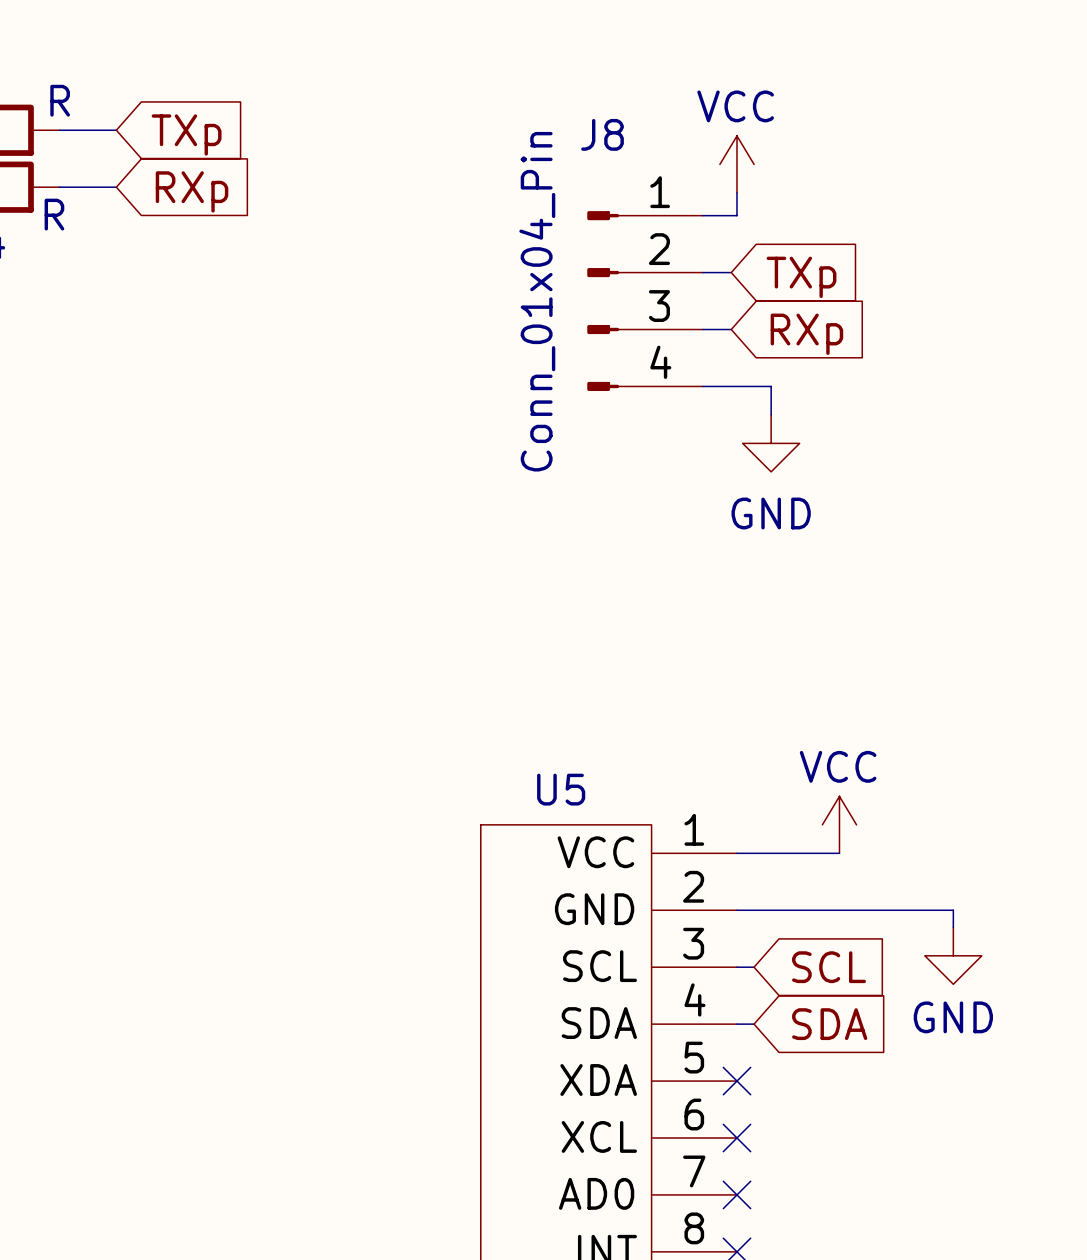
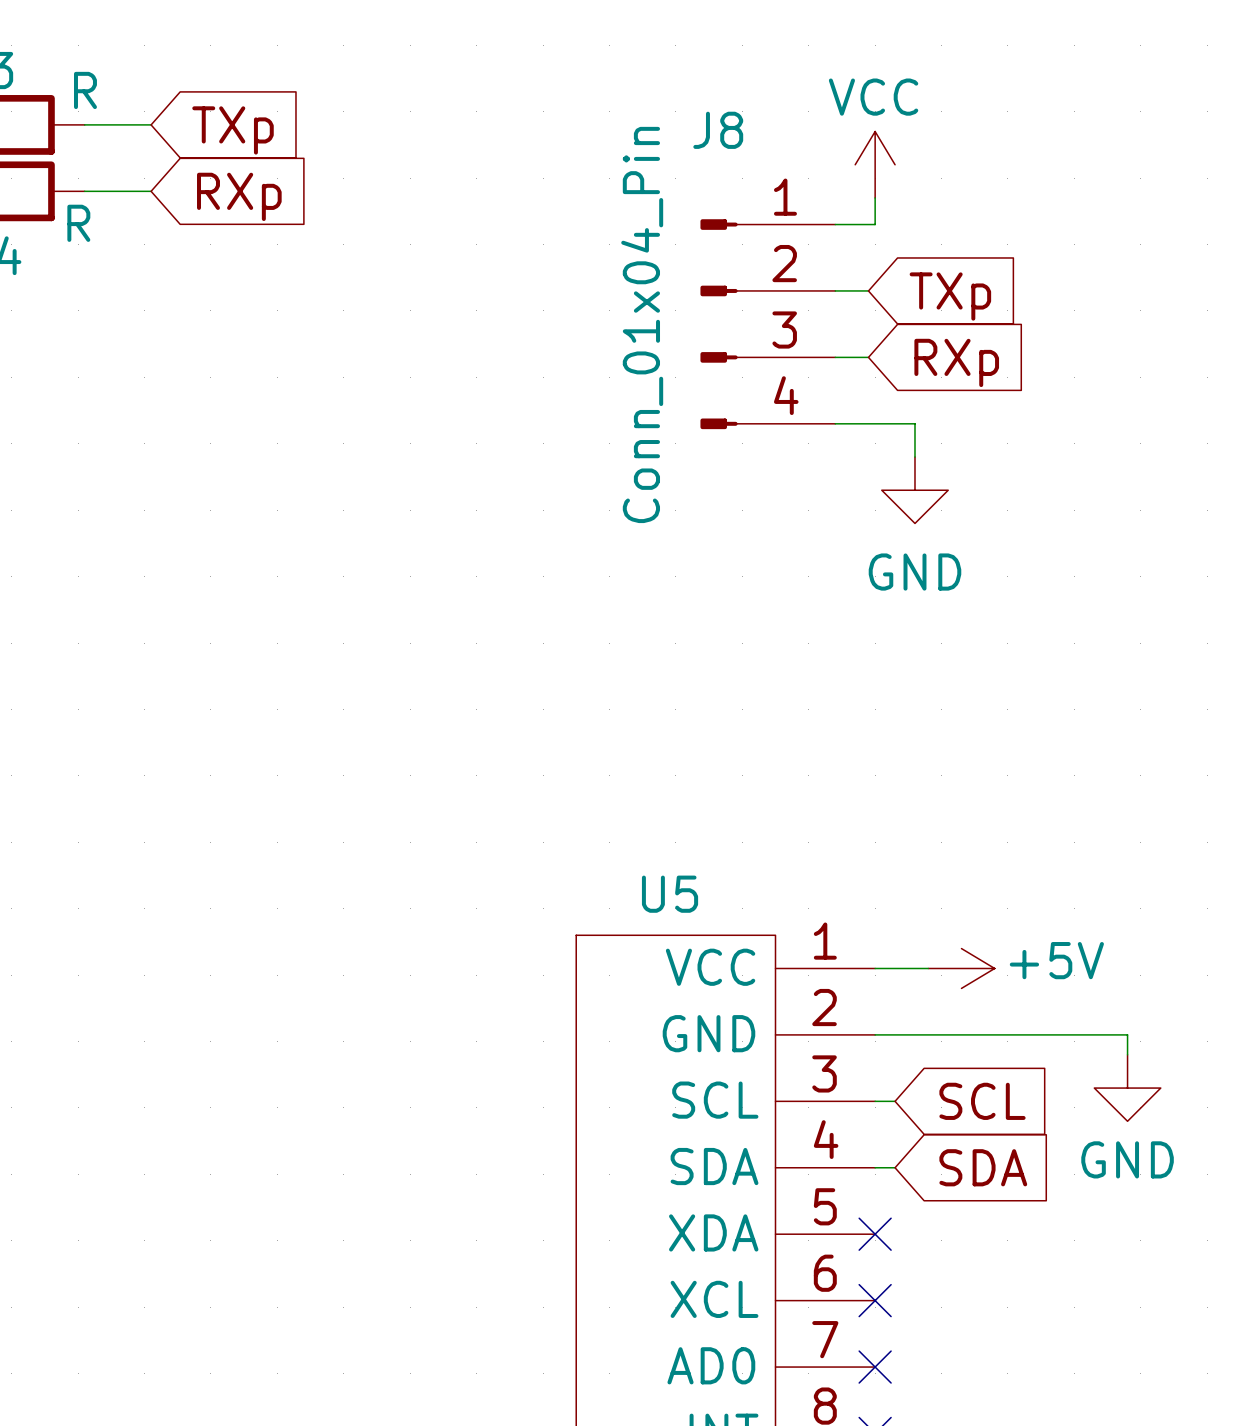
power symbol: VCC (839, 824) -> none
power symbol: none -> +5V (961, 968)

